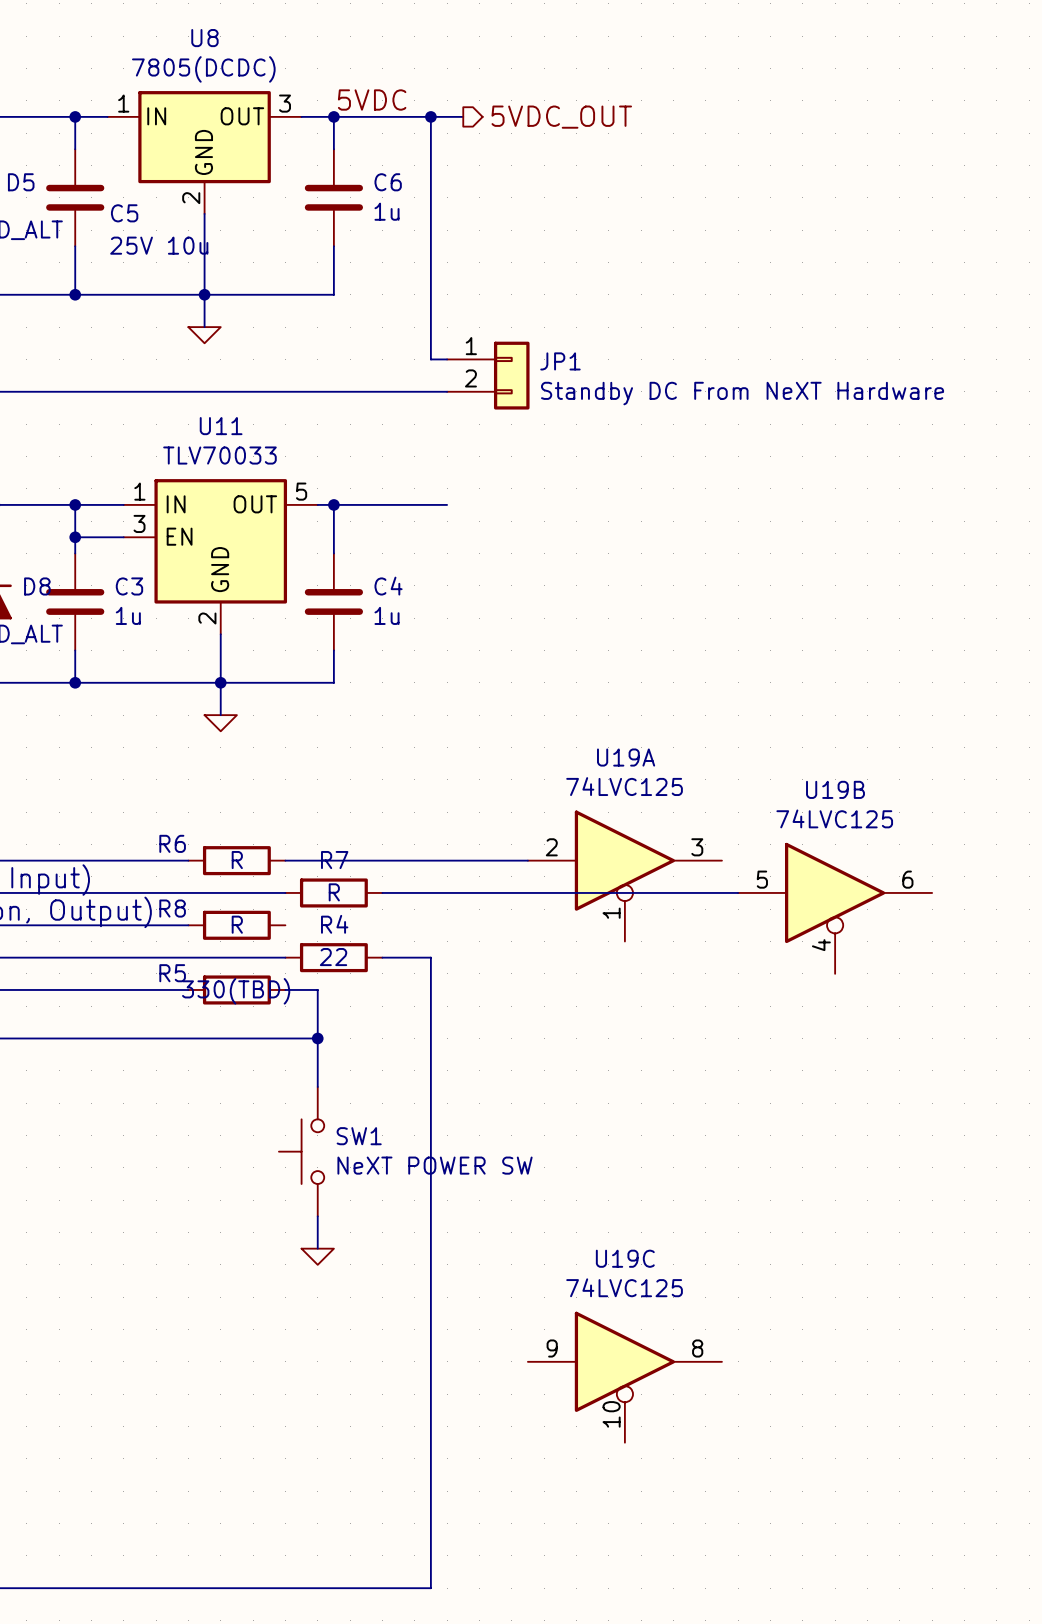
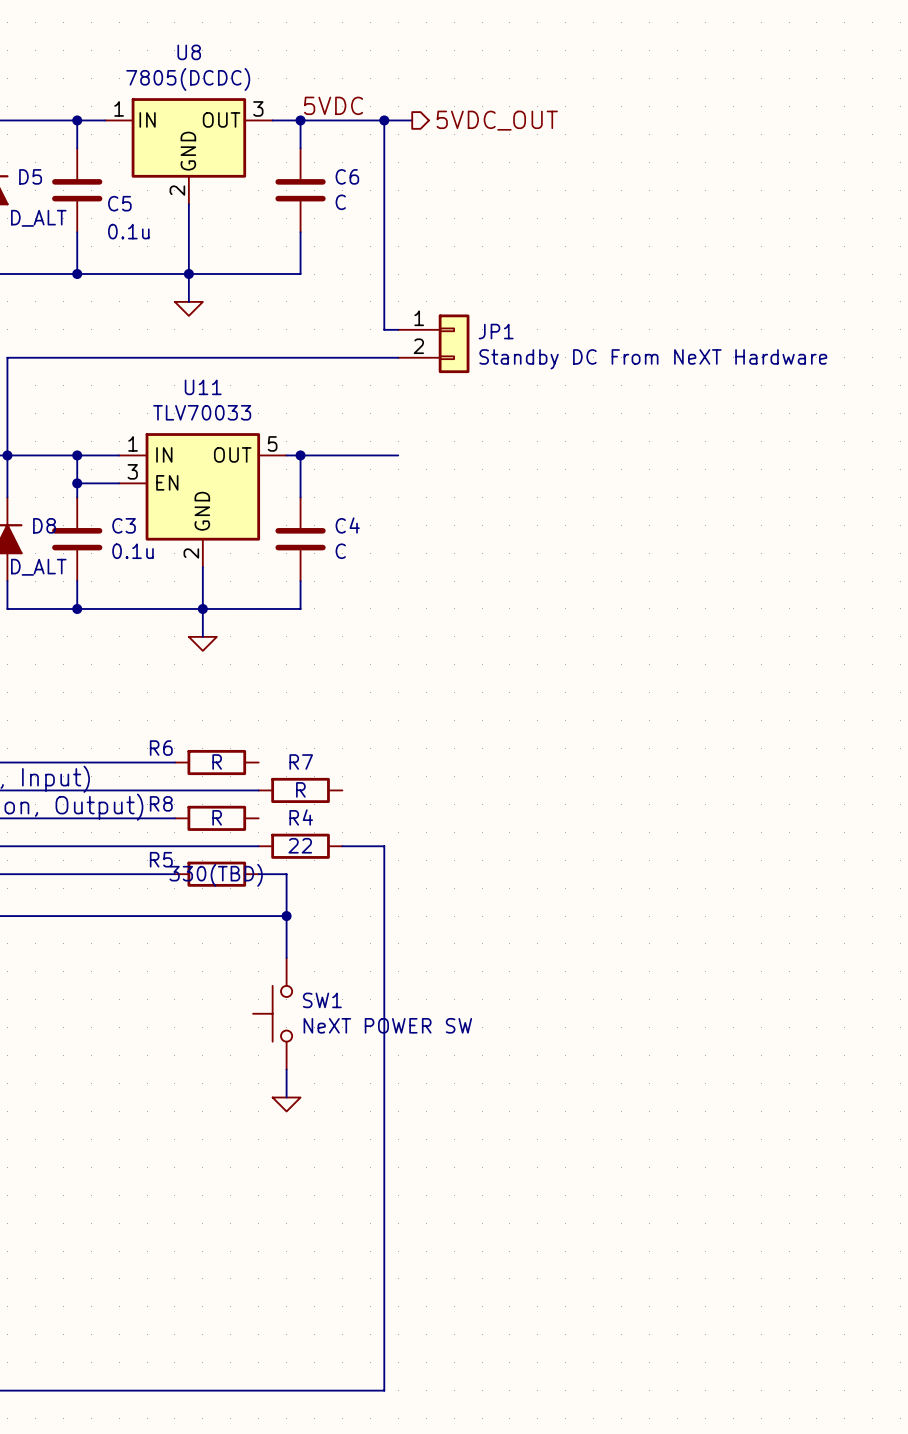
C6 value: 1u (387, 211) -> C (340, 202)
C5 value: 25V 10u (159, 245) -> 0.1u (128, 231)
C3 value: 1u (128, 615) -> 0.1u (133, 551)
C4 value: 1u (387, 615) -> C (340, 551)
wire: (285, 860) (527, 860) -> none
U19A: 74LVC125 (624, 876) -> none
wire: (382, 892) (738, 892) -> none
U19B: 74LVC125 (835, 908) -> none
U19C: 74LVC125 (624, 1377) -> none

